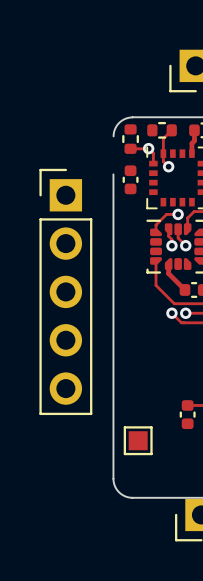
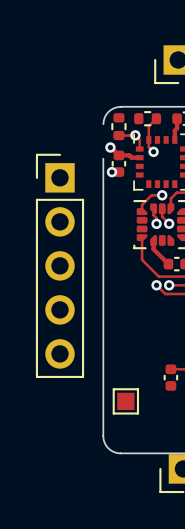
track: none -> (110, 147) (118, 155) (139, 157)
via: none -> (110, 147)
via: none -> (111, 172)

